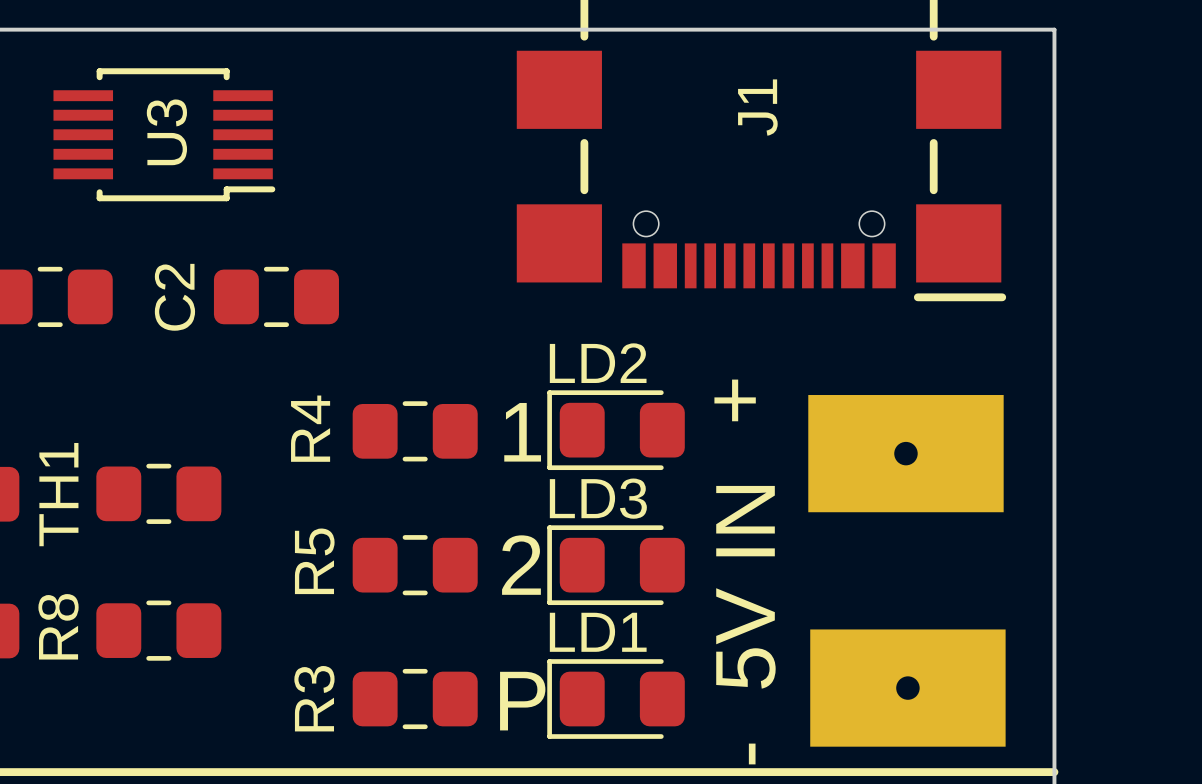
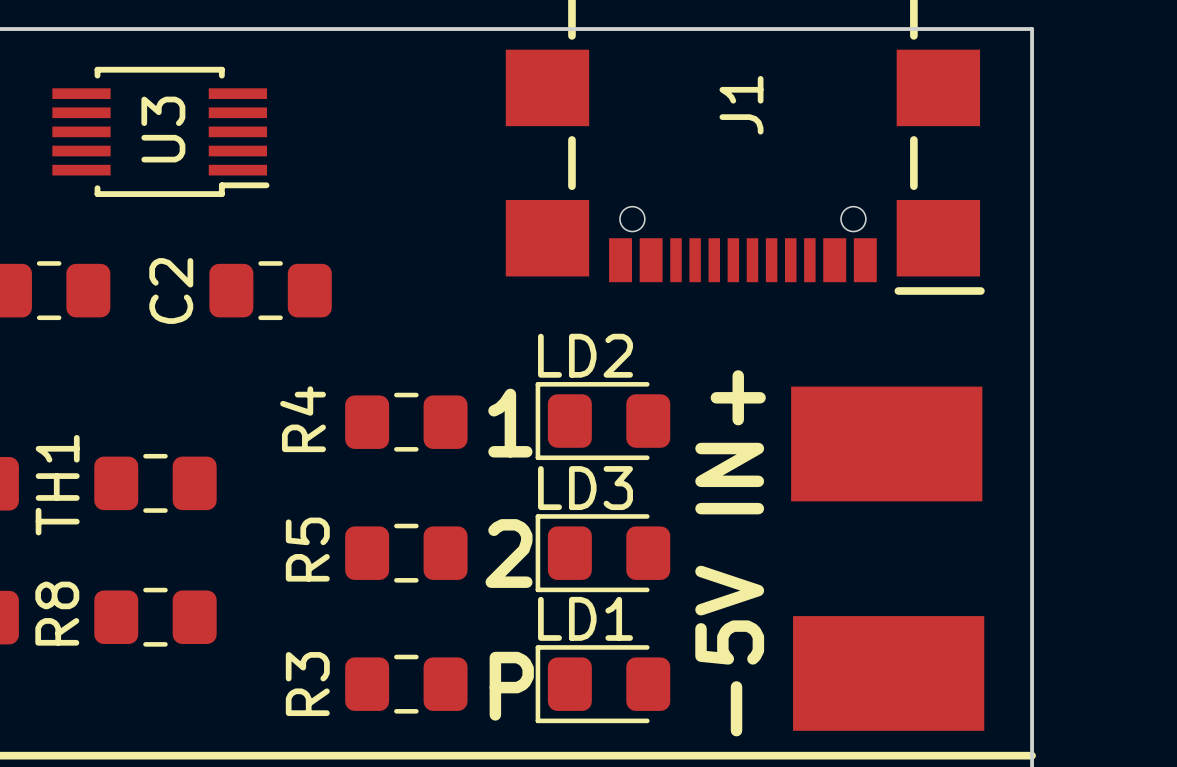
part footprint: [808, 395, 1004, 513] -> [791, 386, 983, 502]
part footprint: [810, 629, 1006, 747] -> [793, 616, 985, 731]

